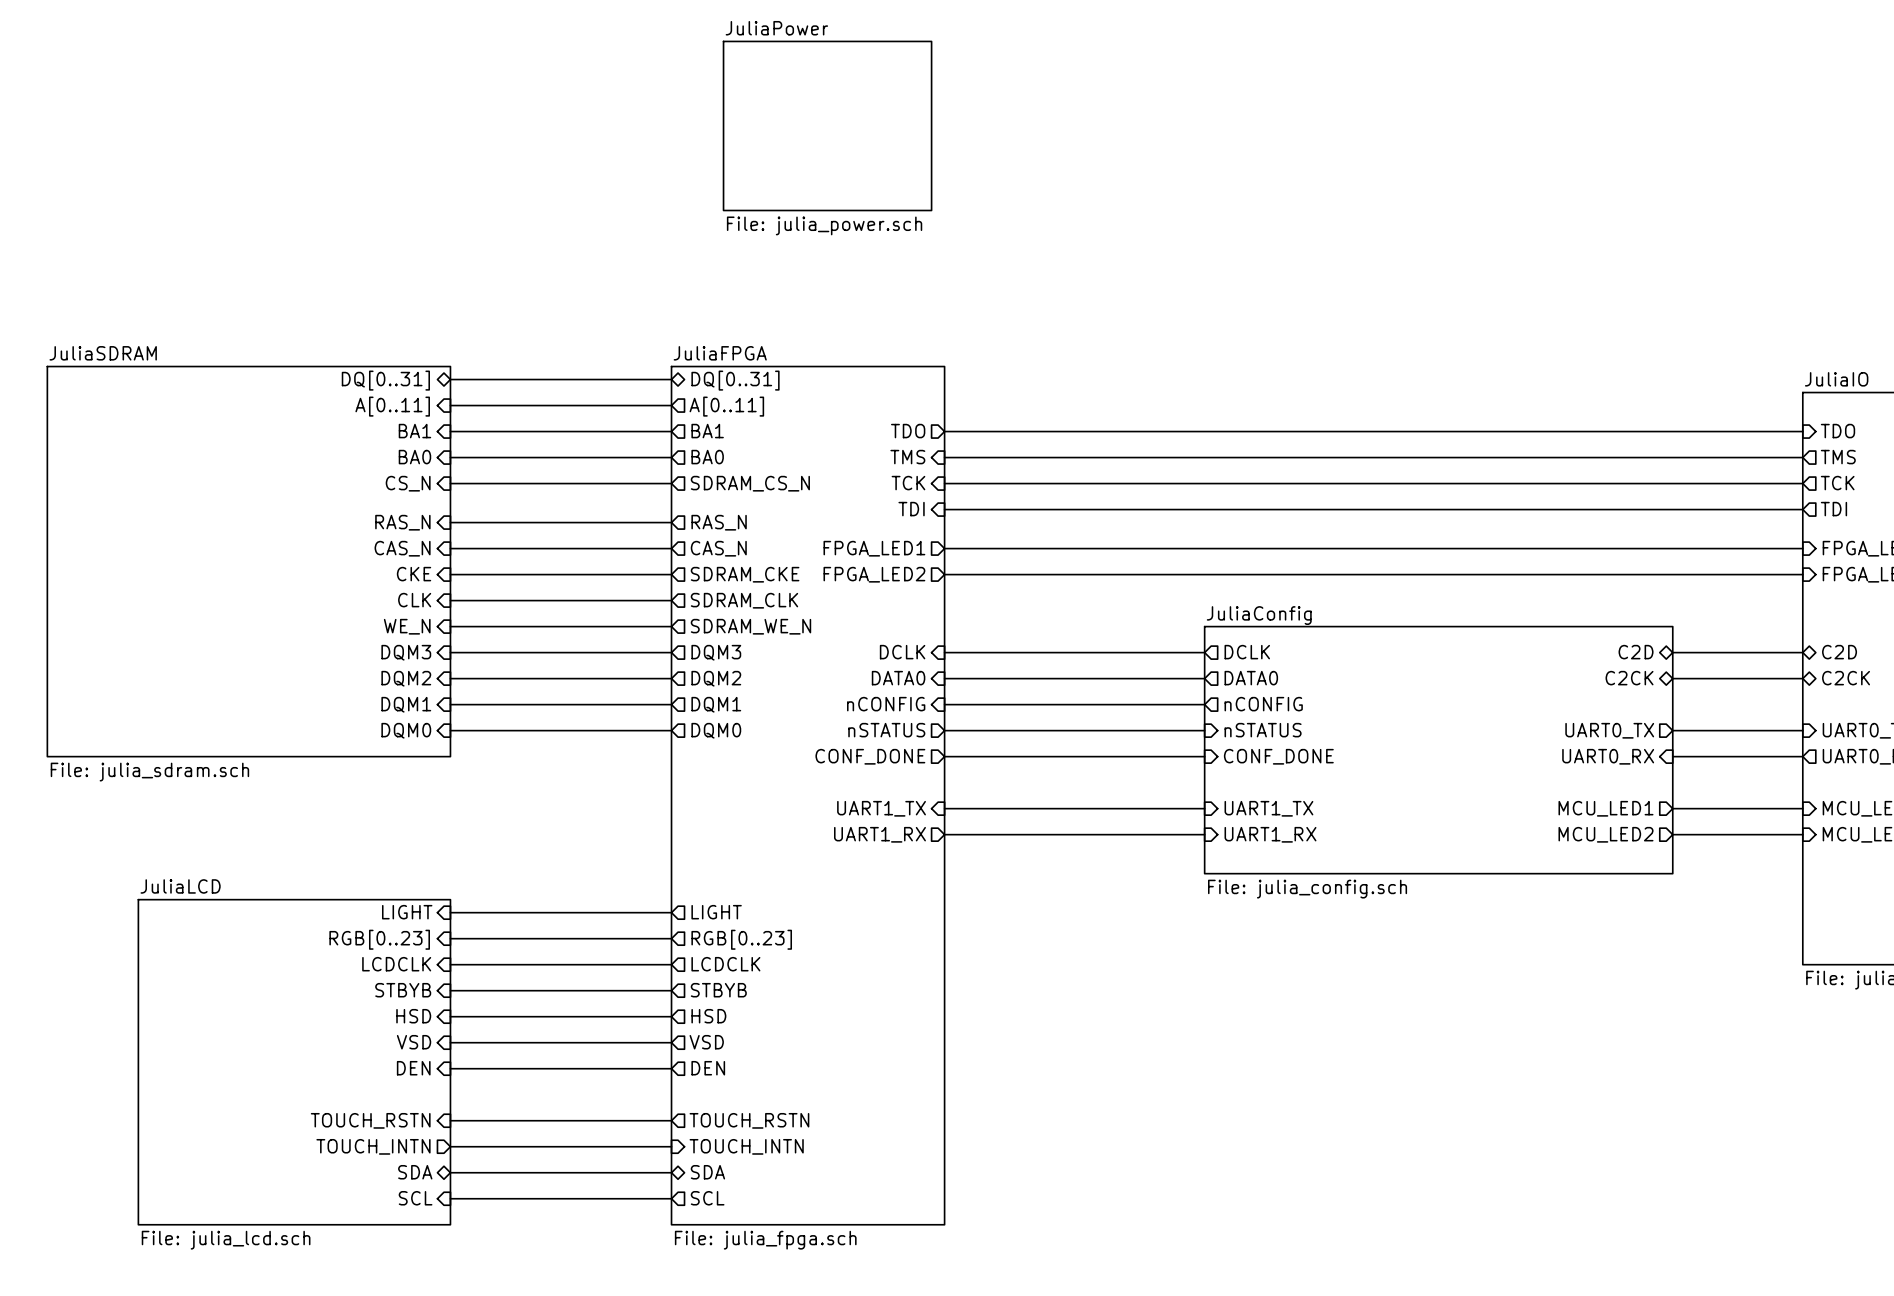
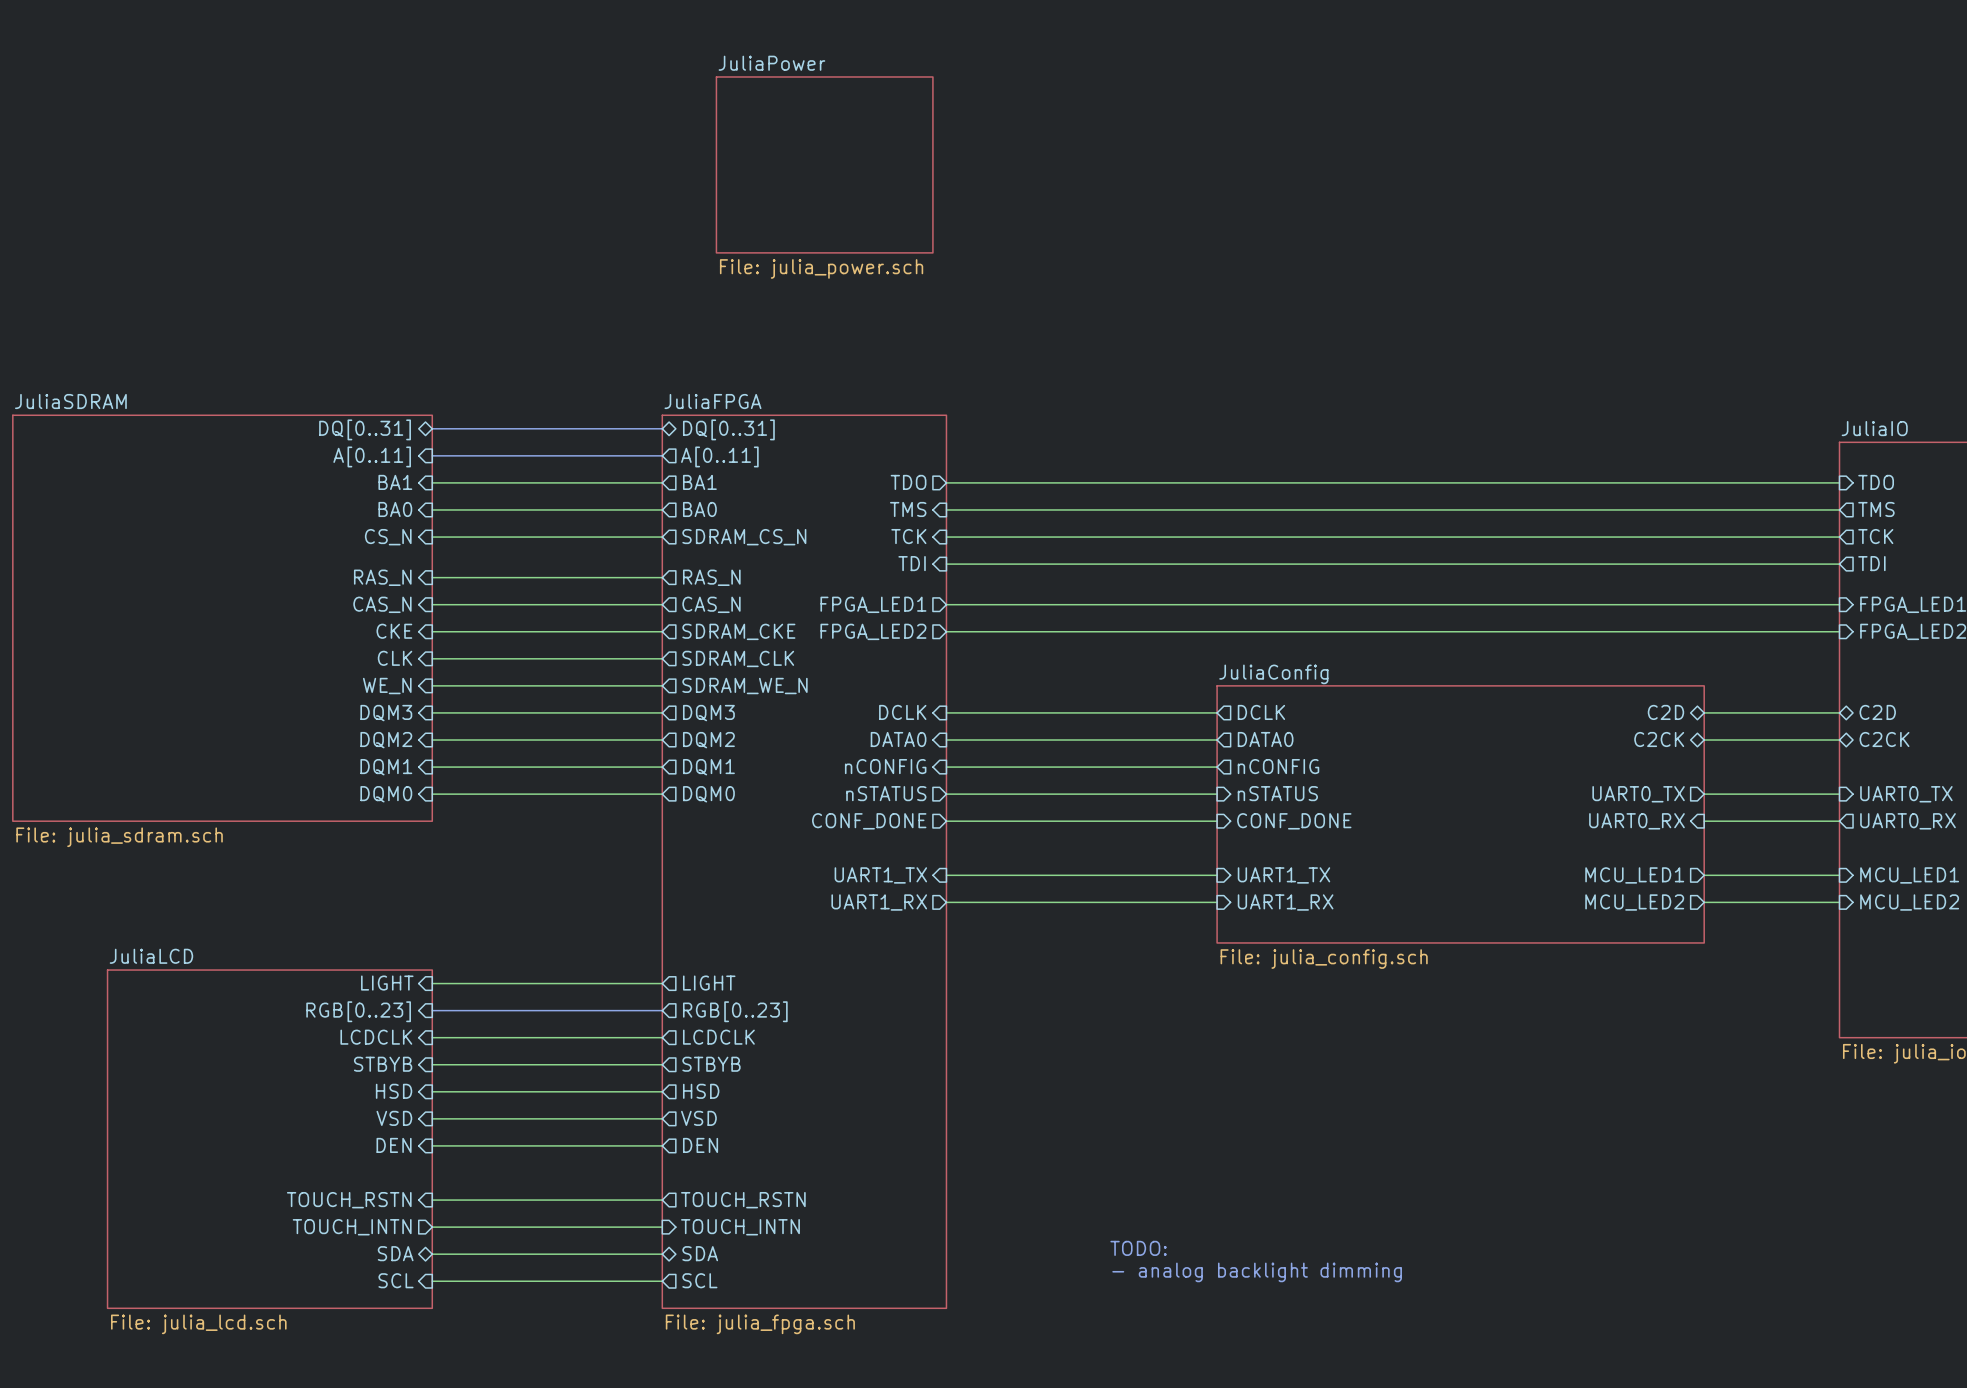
text: none -> TODO: (1138, 1248)
text: none -> - analog backlight dimming (1257, 1272)

